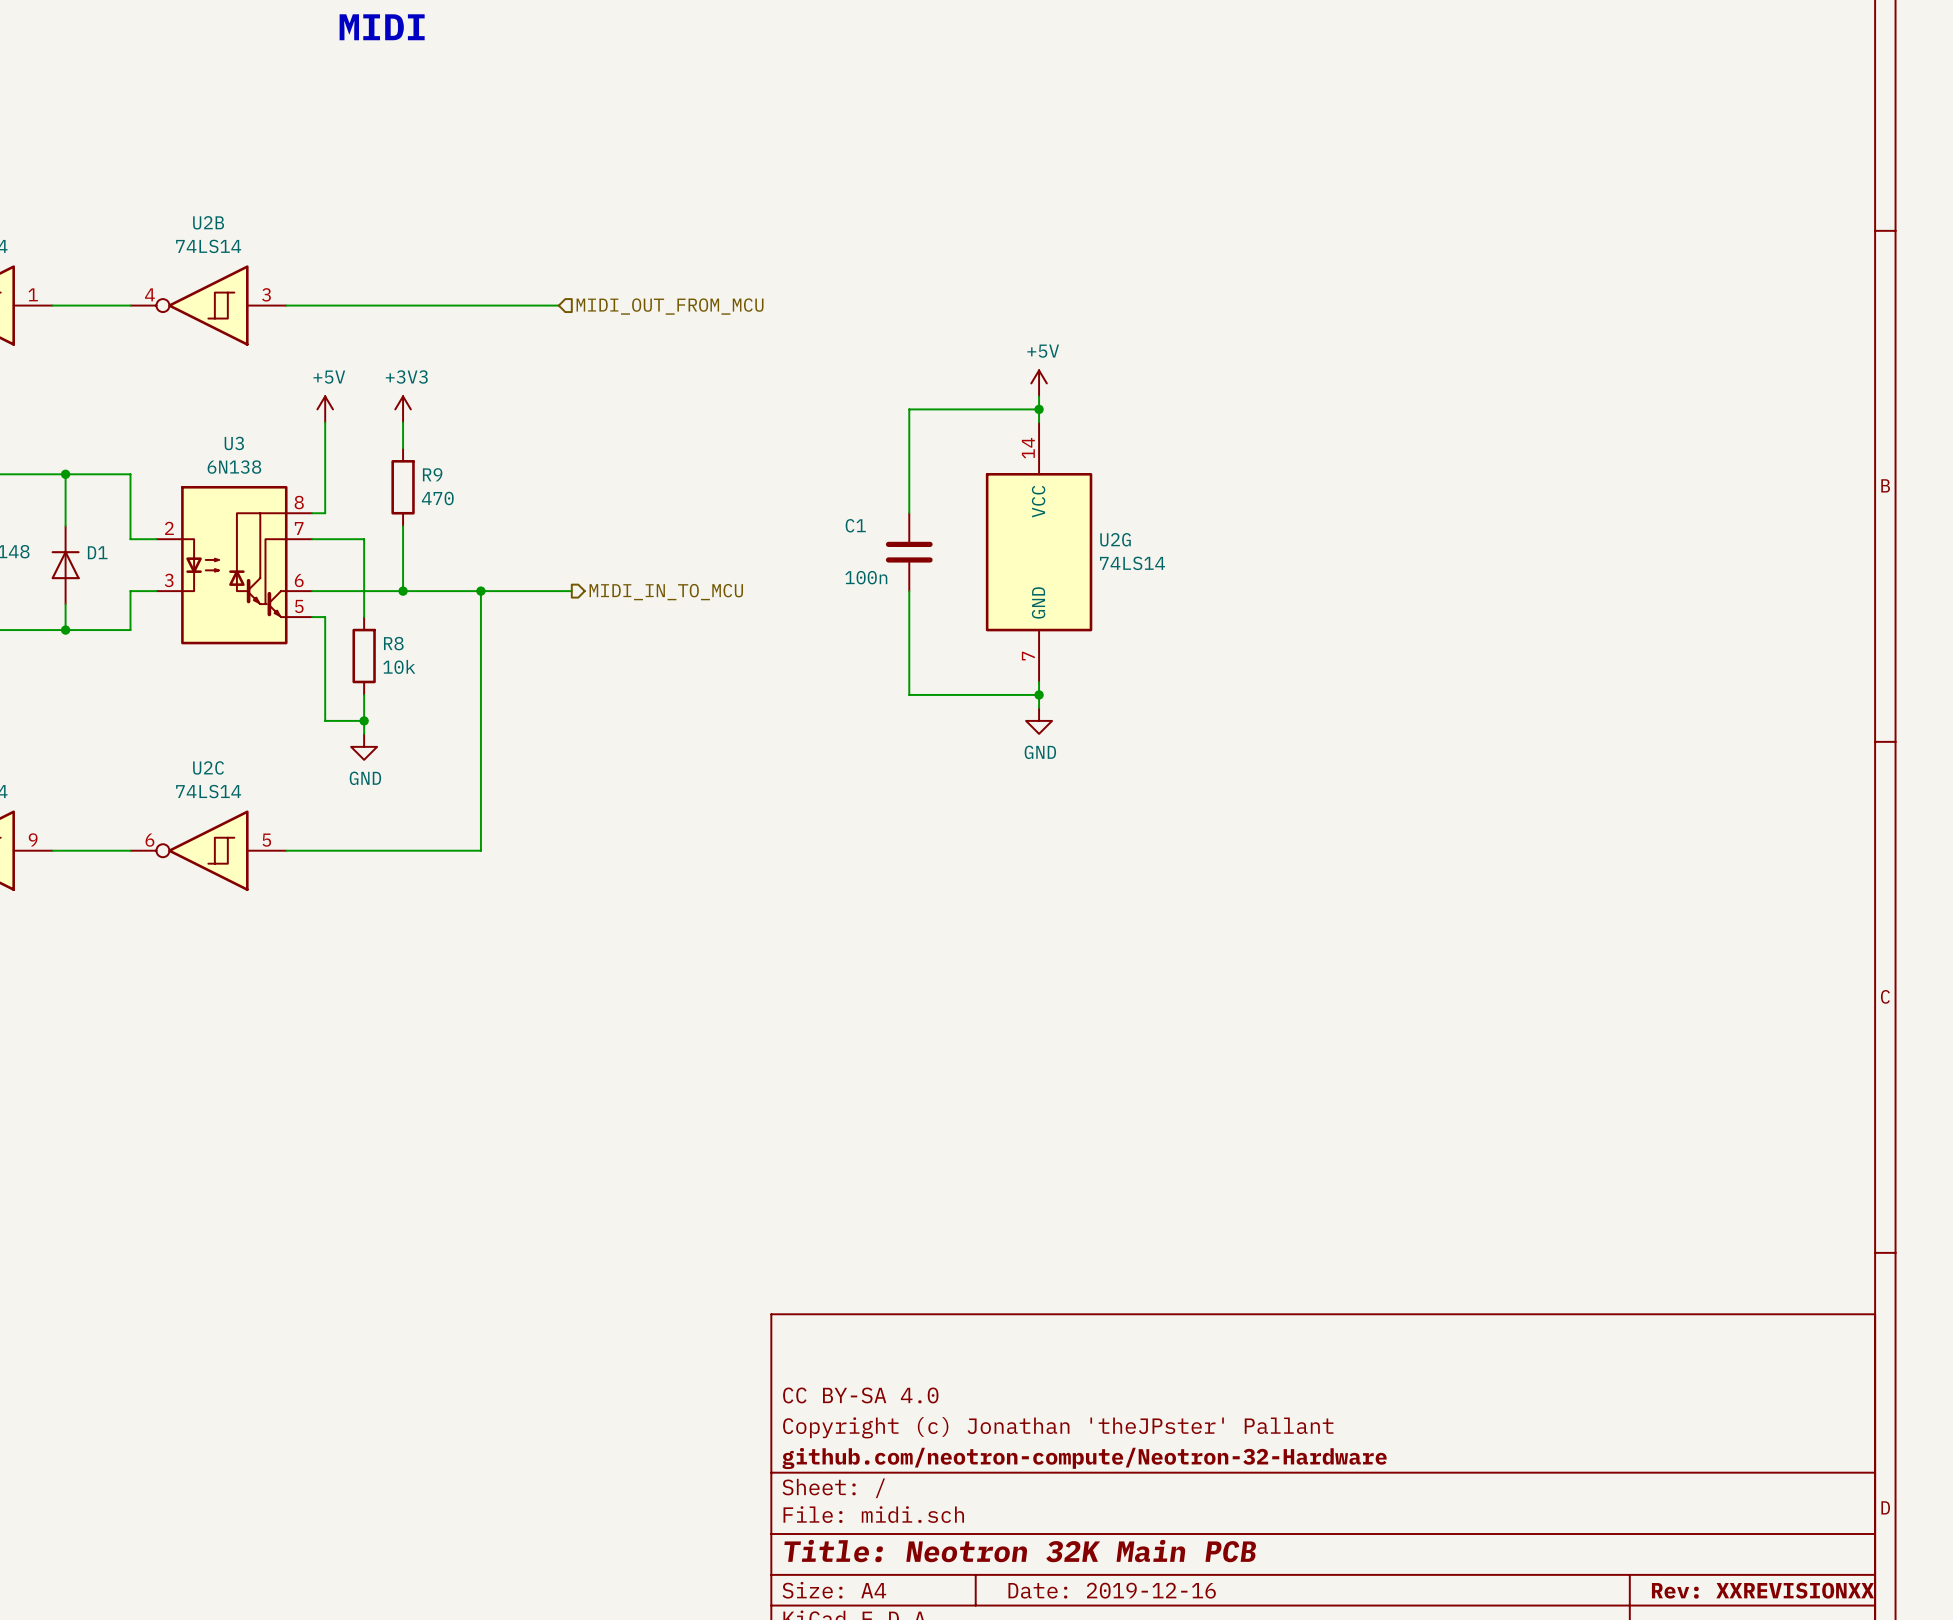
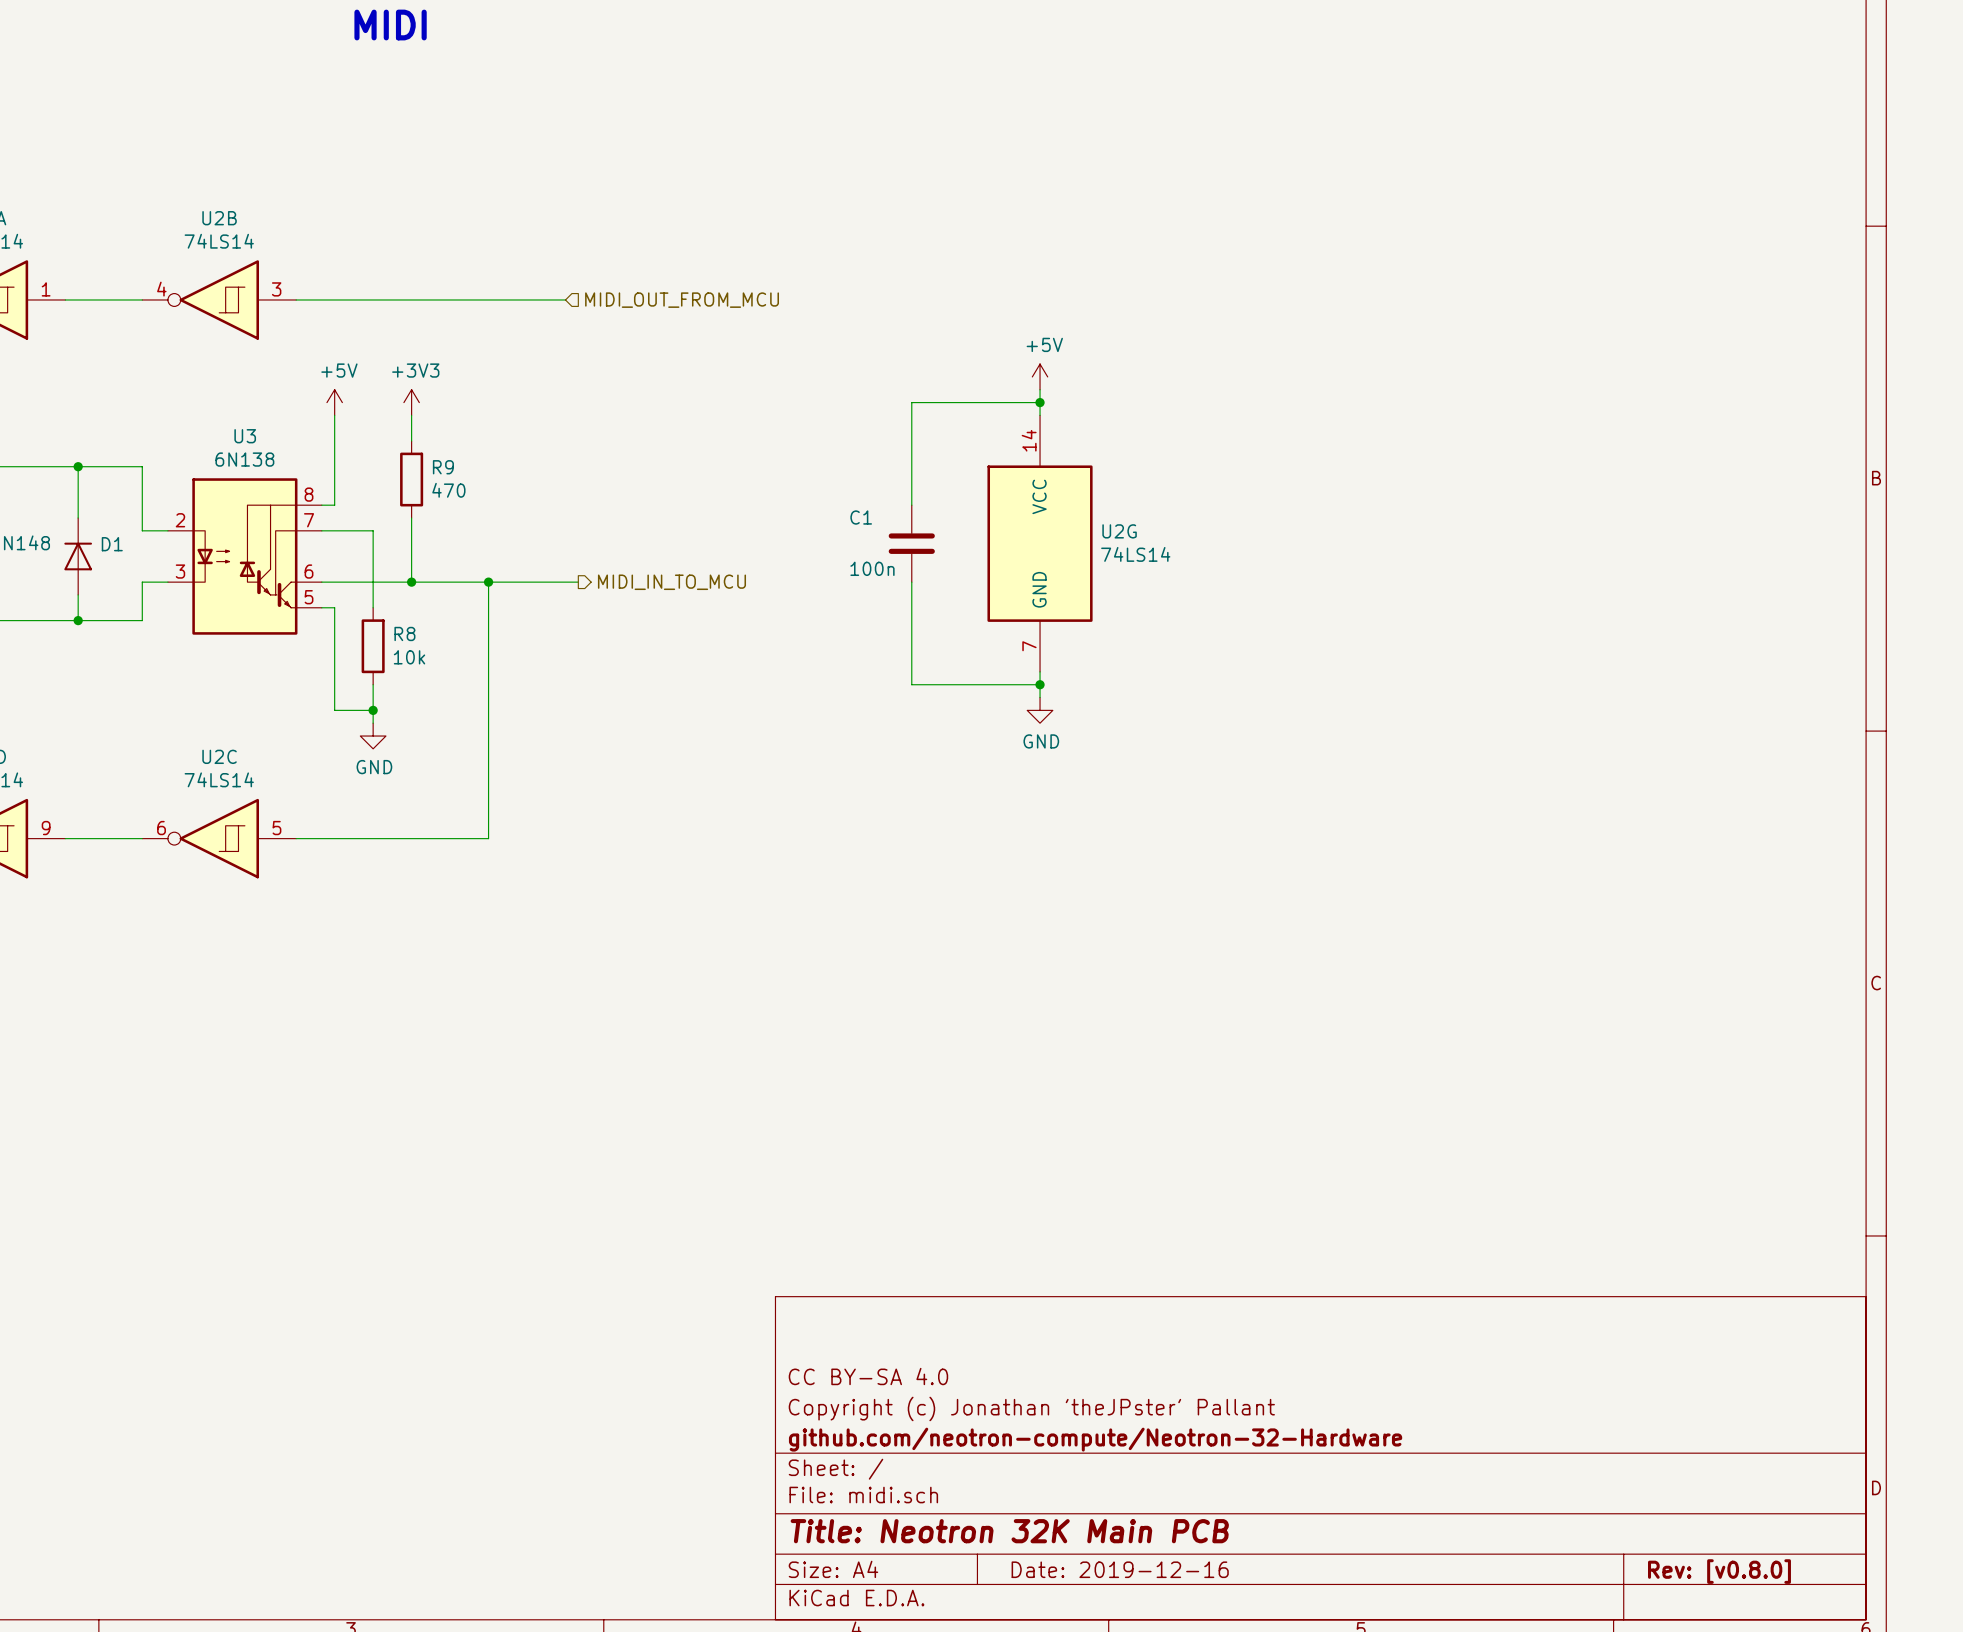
title block: Rev: XXREVISIONXX (1763, 1590) -> Rev: [v0.8.0] (1719, 1571)

